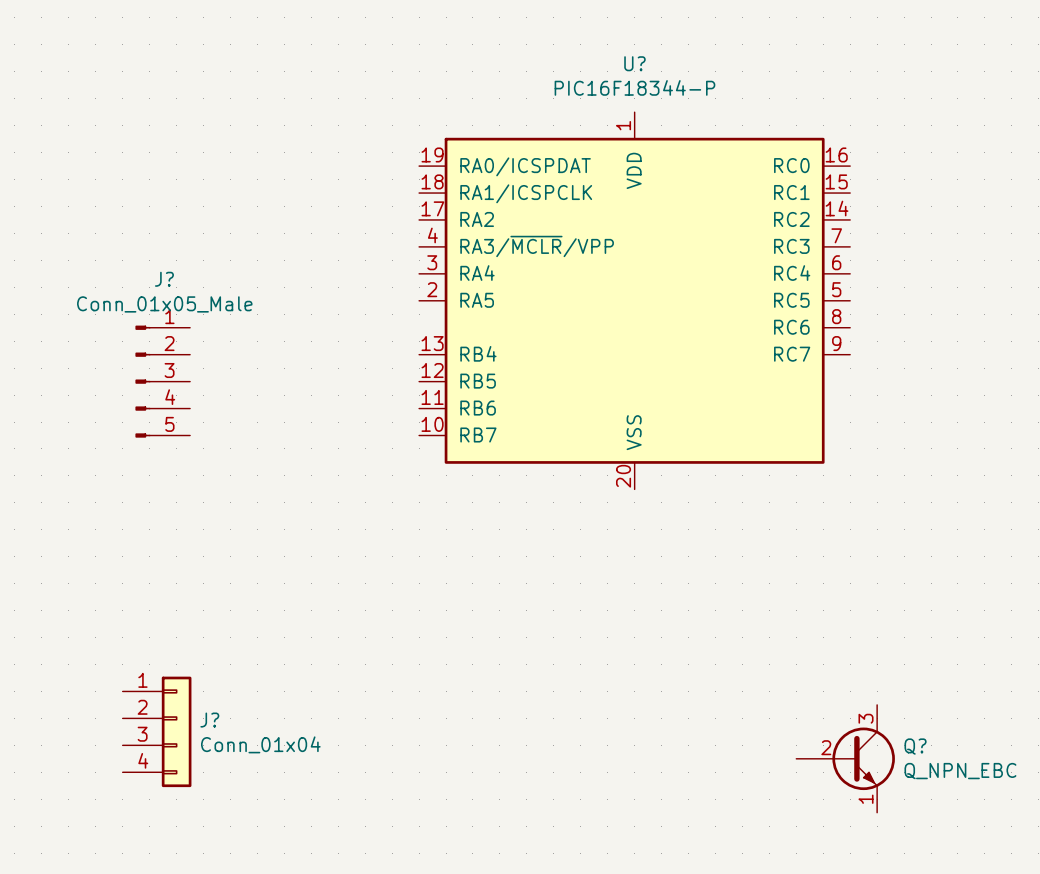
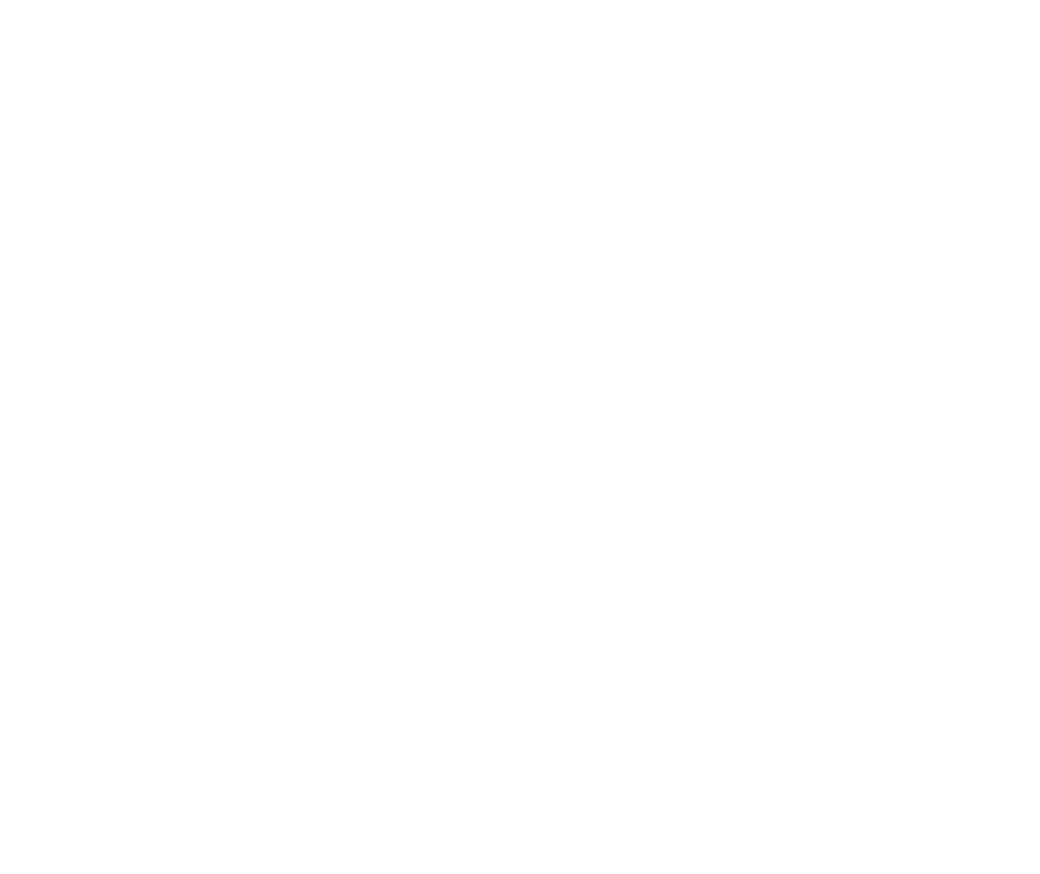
U?: PIC16F18344-P (634, 300) -> none
J?: Conn_01x05_Male (162, 381) -> none
J?: Conn_01x04 (157, 731) -> none
Q?: Q_NPN_EBC (845, 758) -> none

